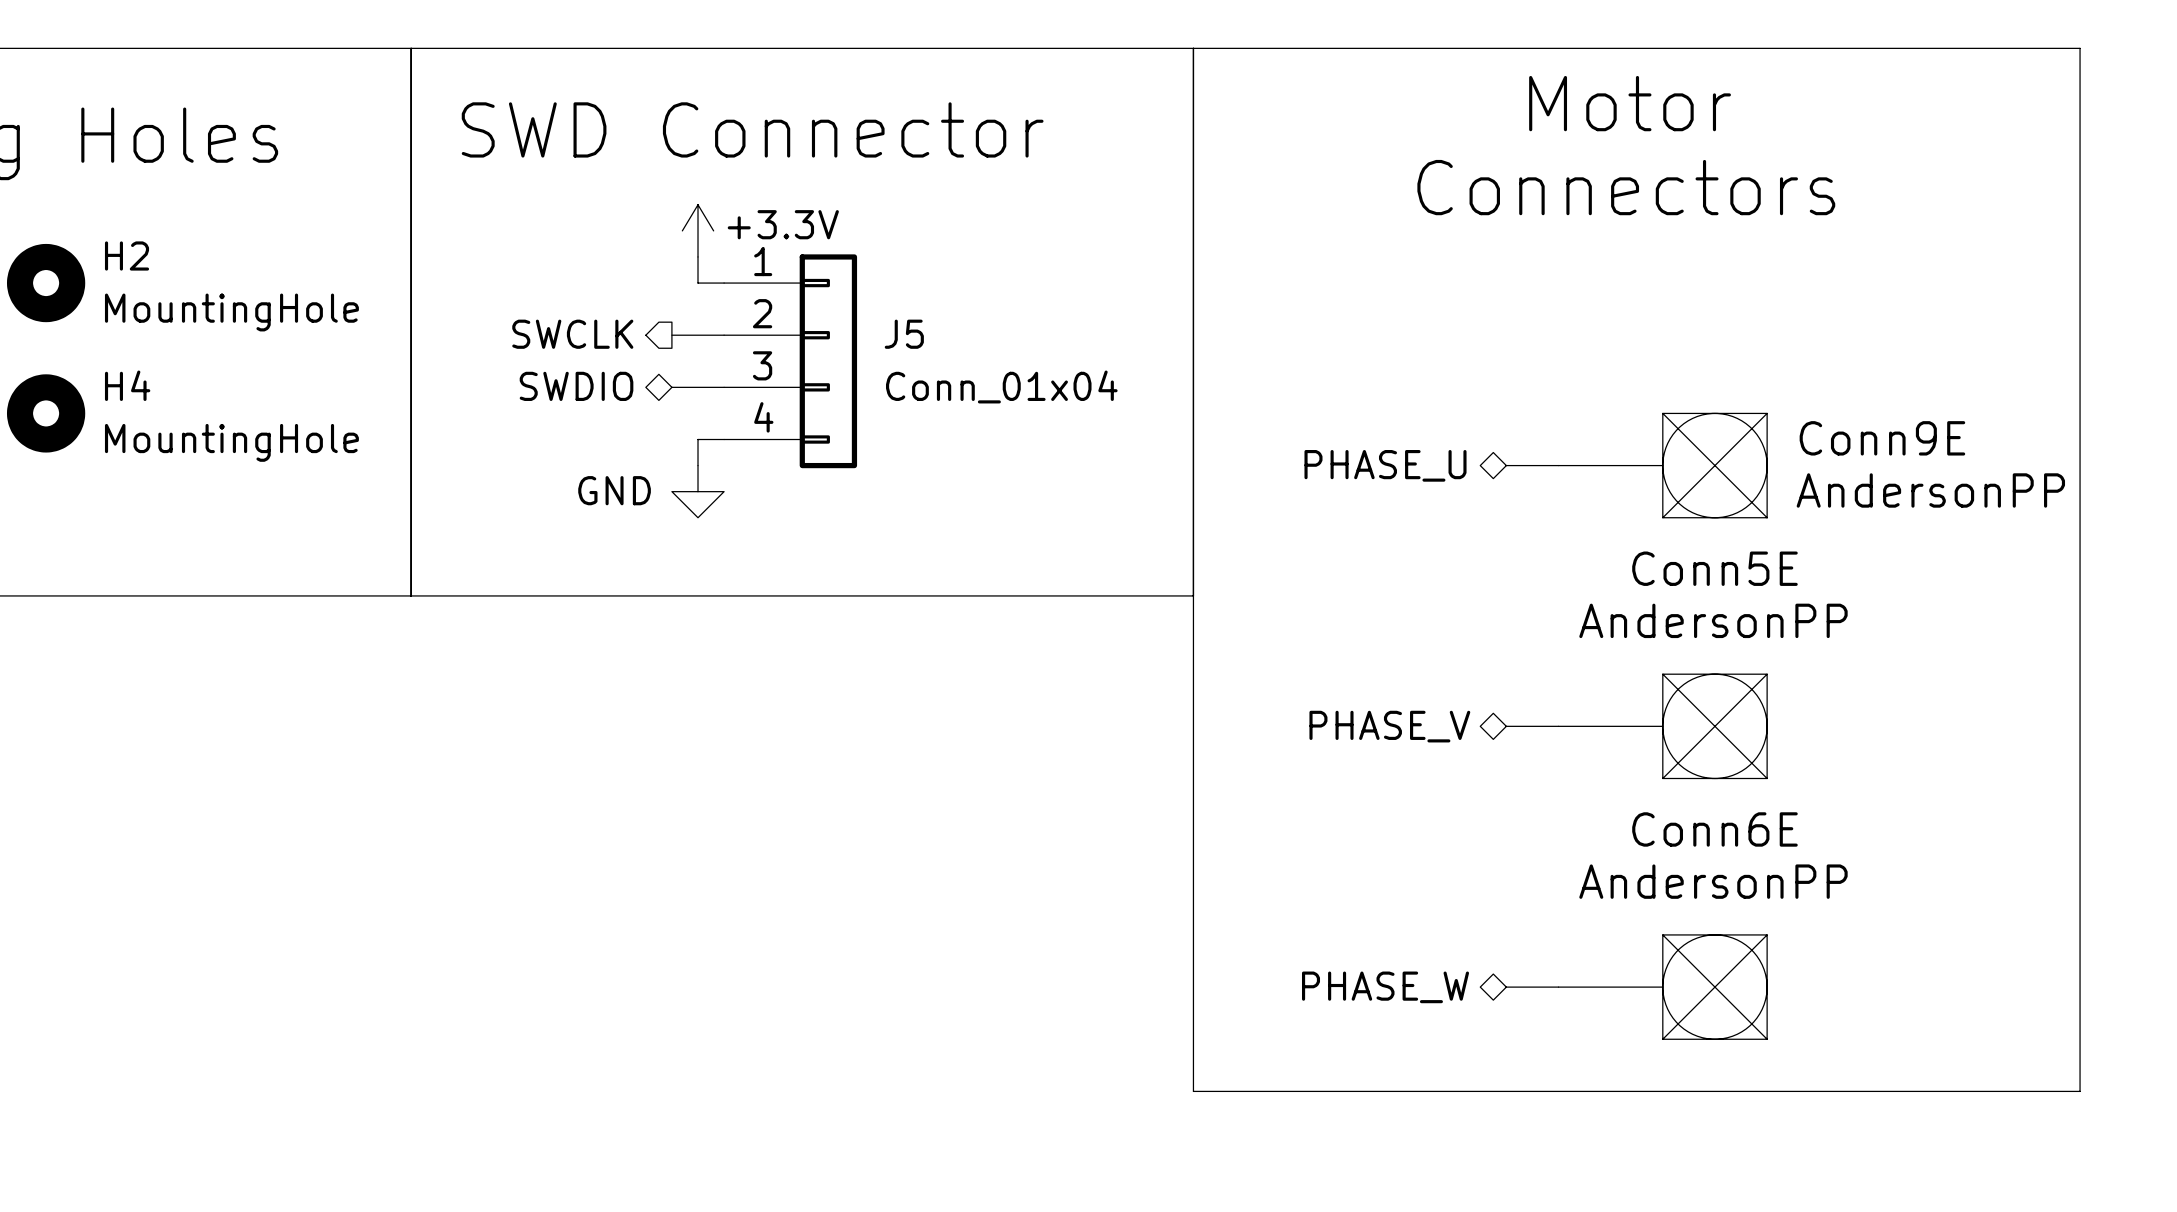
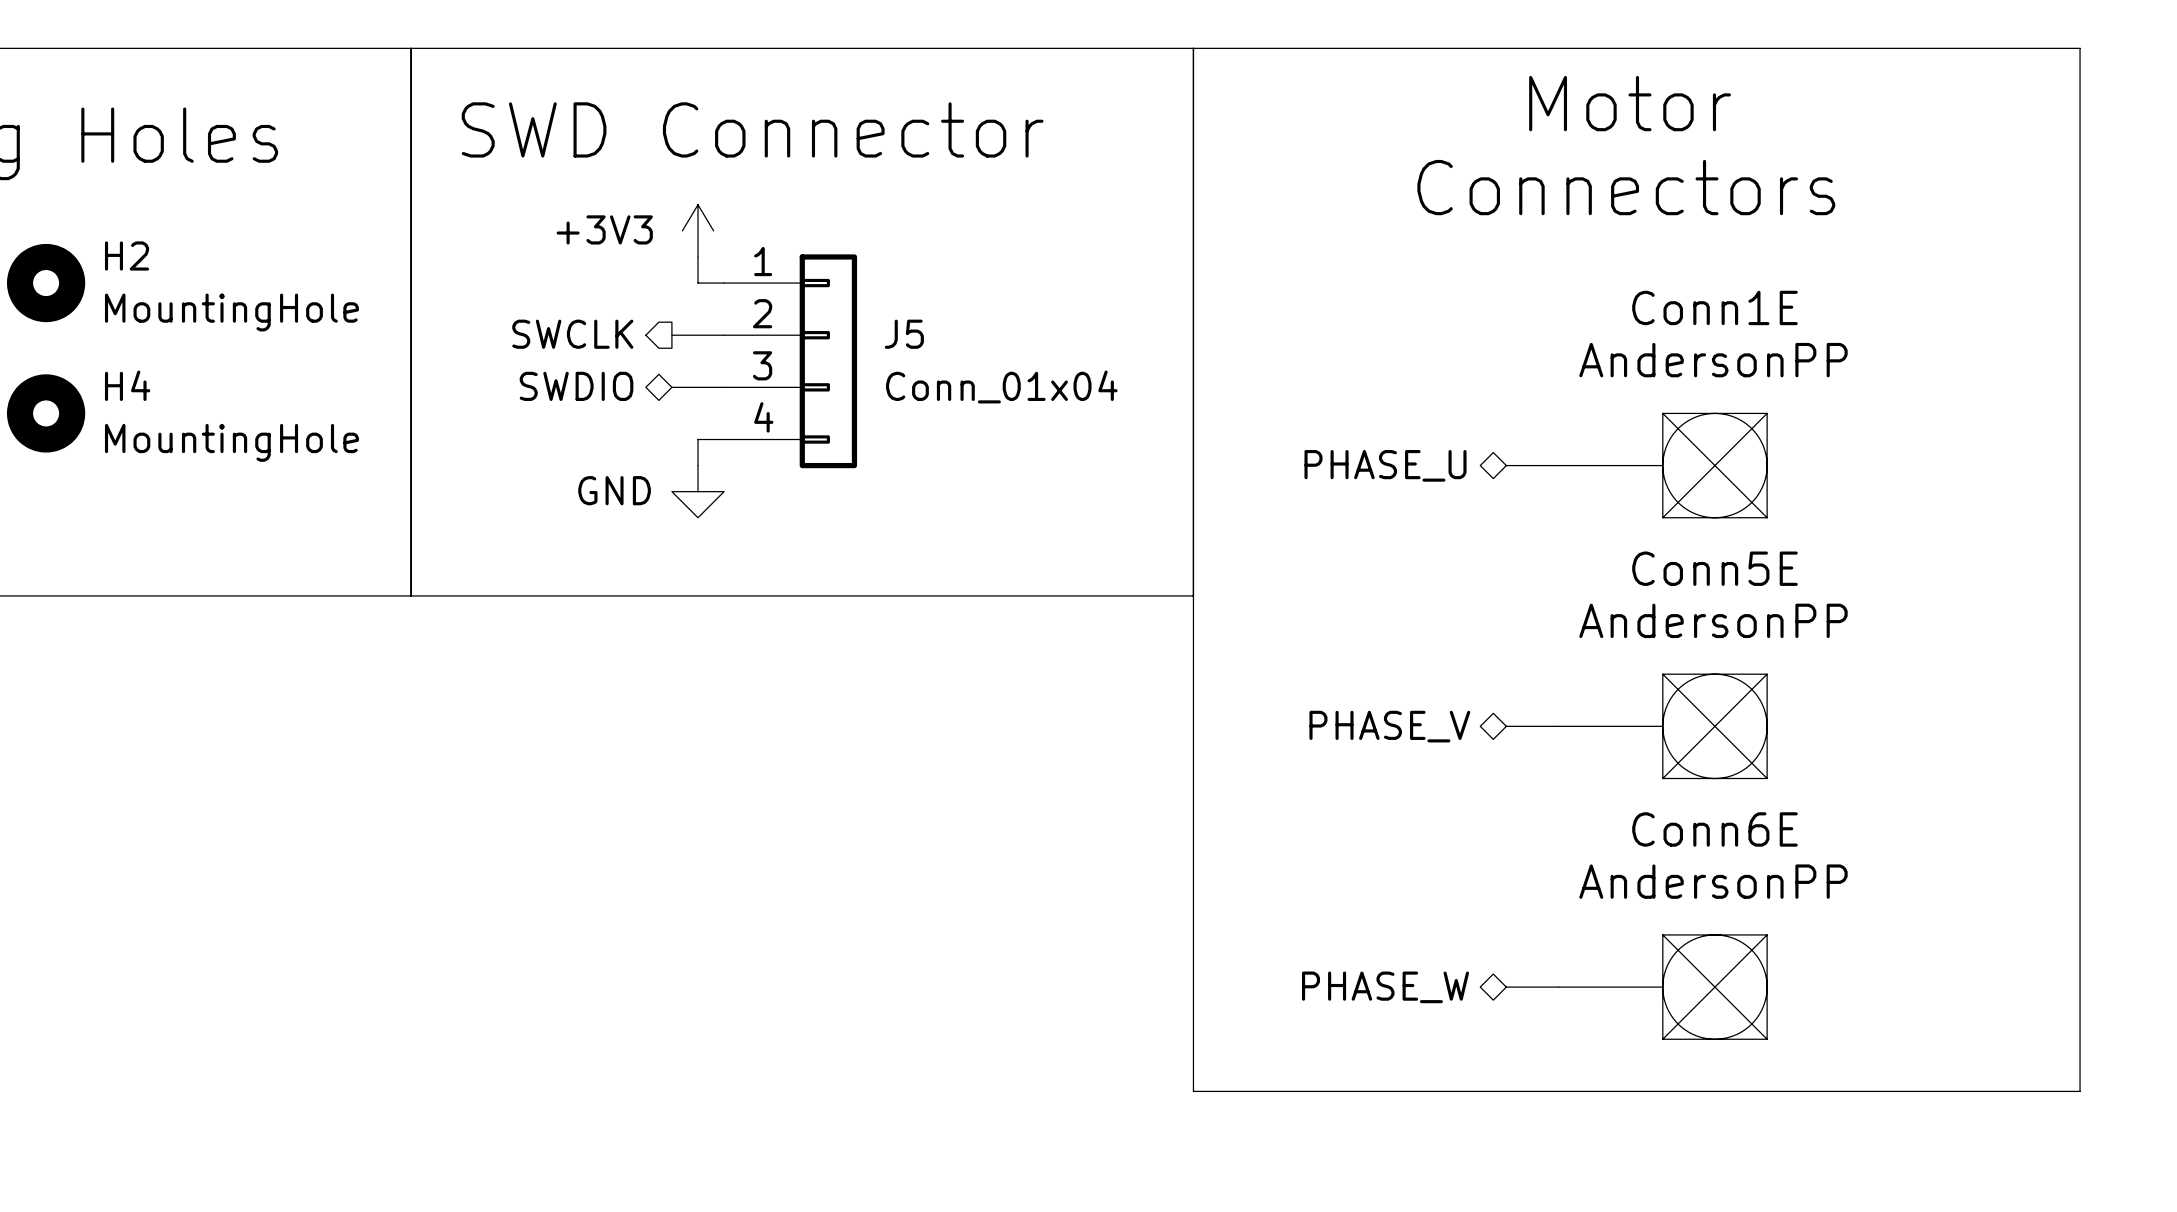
power symbol: +3.3V (698, 230) -> +3V3 (698, 230)
Conn9E name: Conn9E (1882, 438) -> Conn1E (1714, 307)
Conn9E value position: AndersonPP (1930, 490) -> AndersonPP (1713, 360)

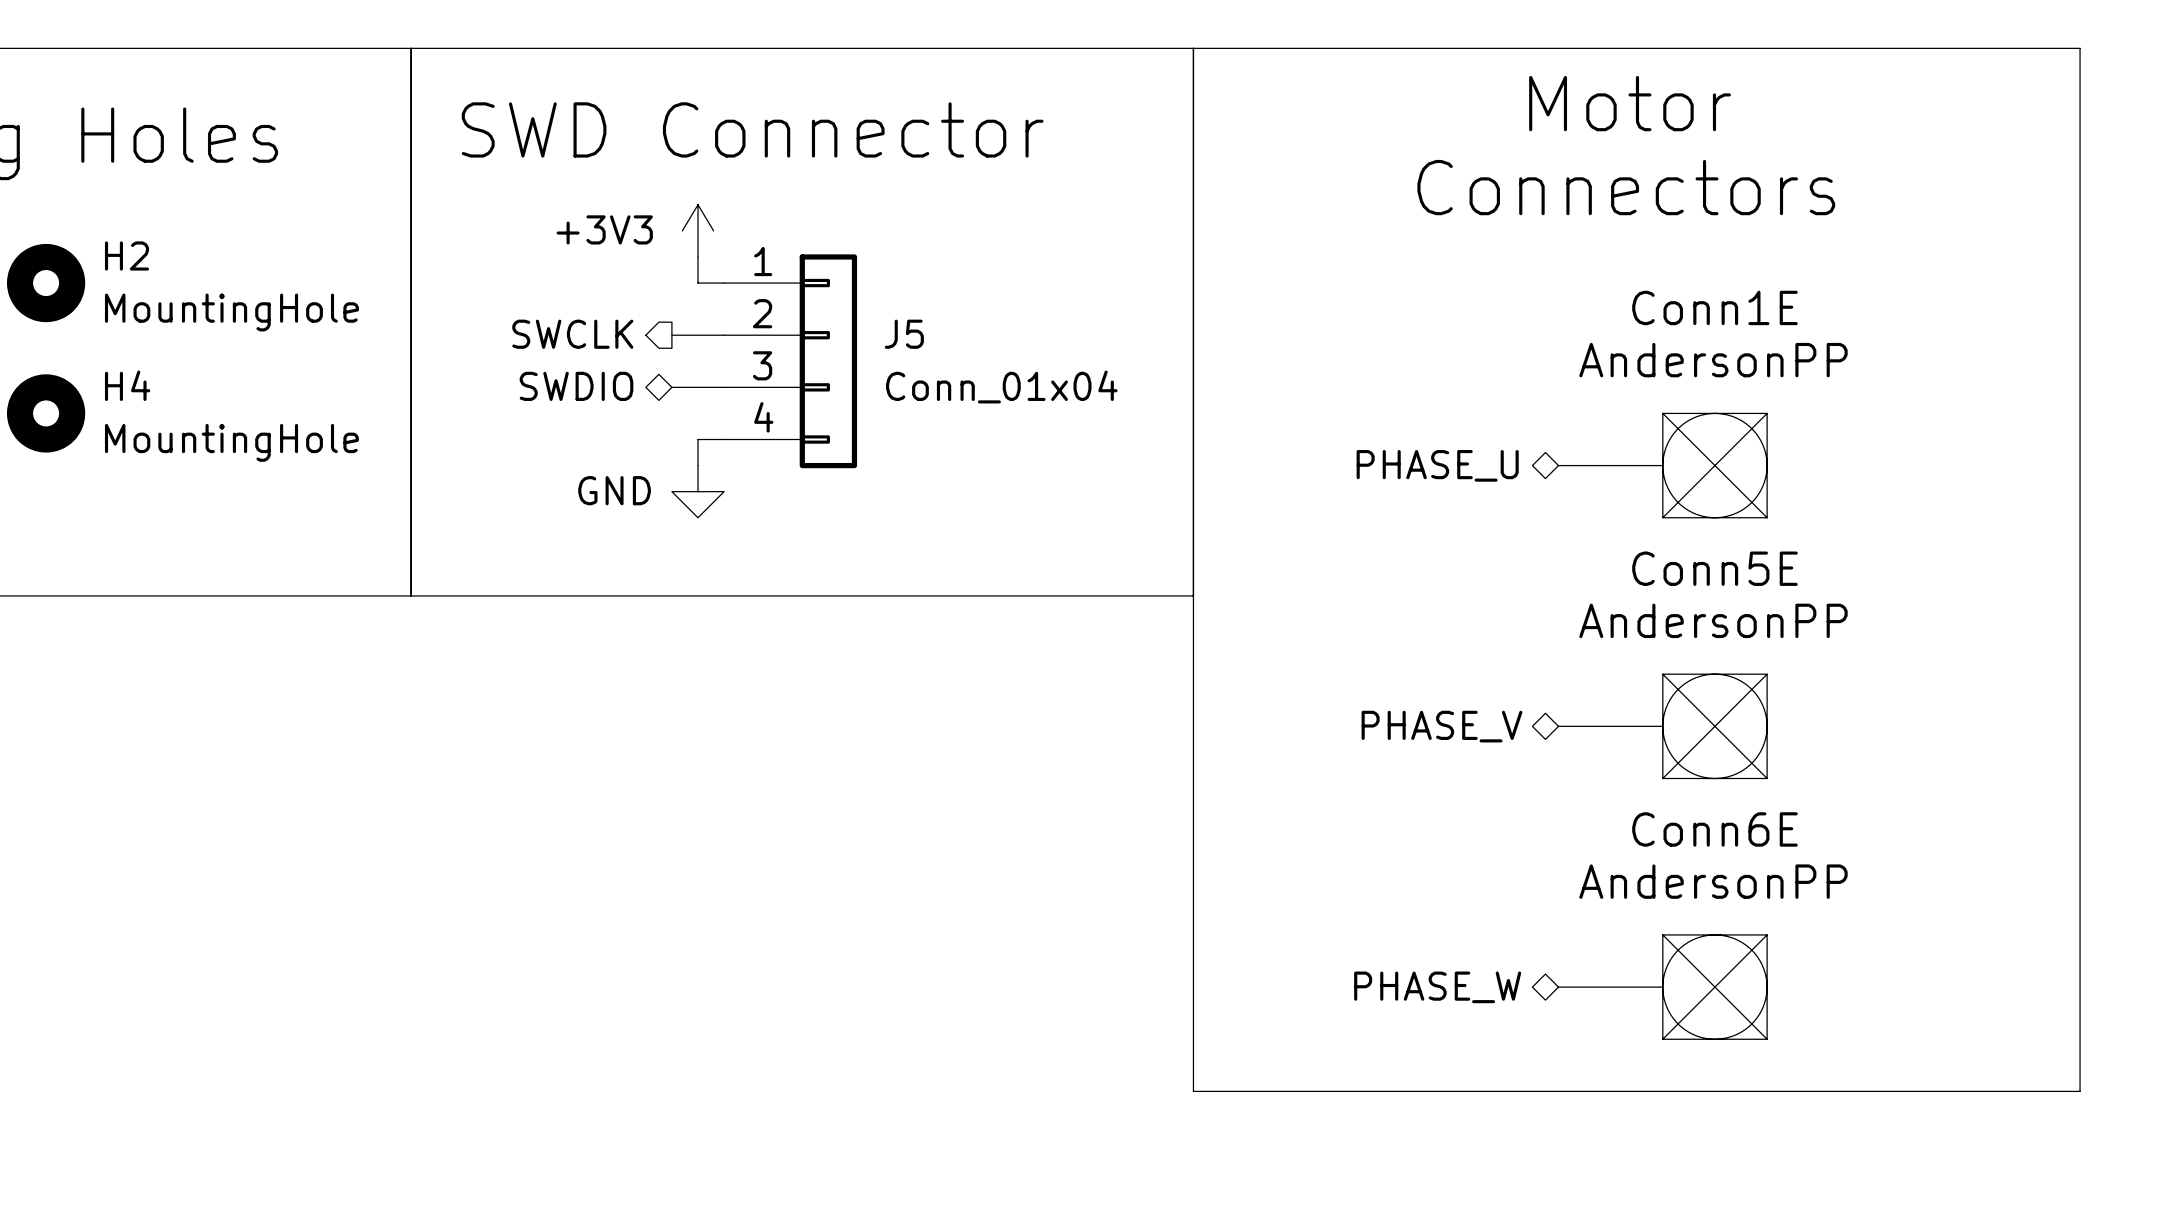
hierarchical label position: PHASE_U (1385, 465) -> PHASE_U (1437, 465)
wire: (1506, 465) (1558, 465) -> none
hierarchical label position: PHASE_V (1389, 726) -> PHASE_V (1442, 726)
wire: (1506, 726) (1558, 726) -> none
hierarchical label position: PHASE_W (1385, 987) -> PHASE_W (1437, 987)
wire: (1506, 987) (1558, 987) -> none

